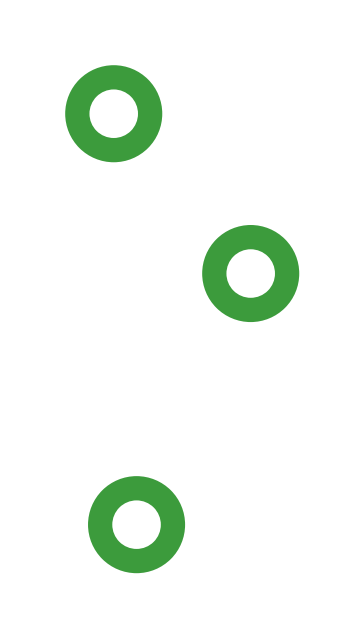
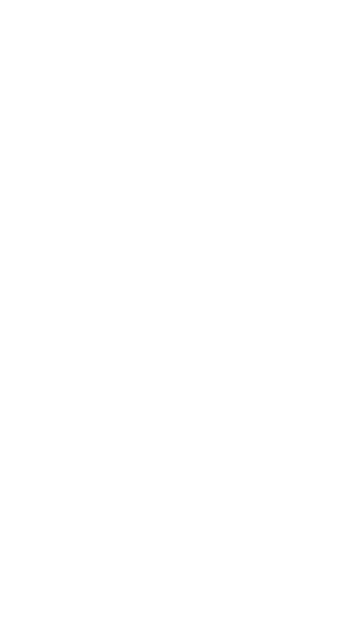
part: (113, 113) -> none
part: (250, 273) -> none
part: (136, 524) -> none

